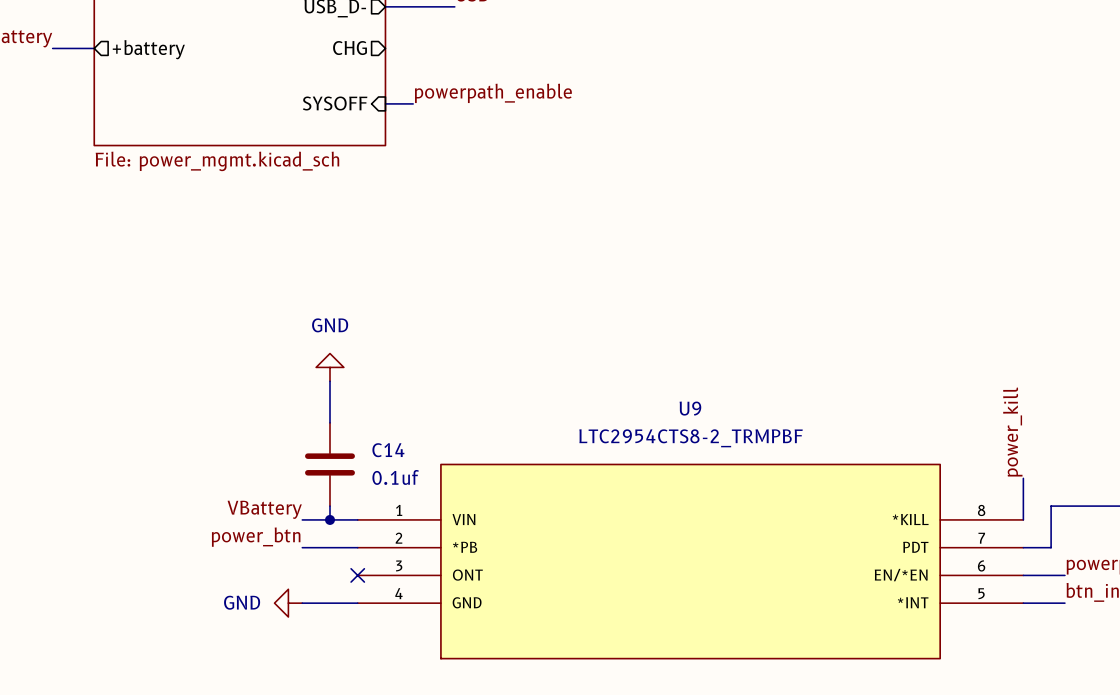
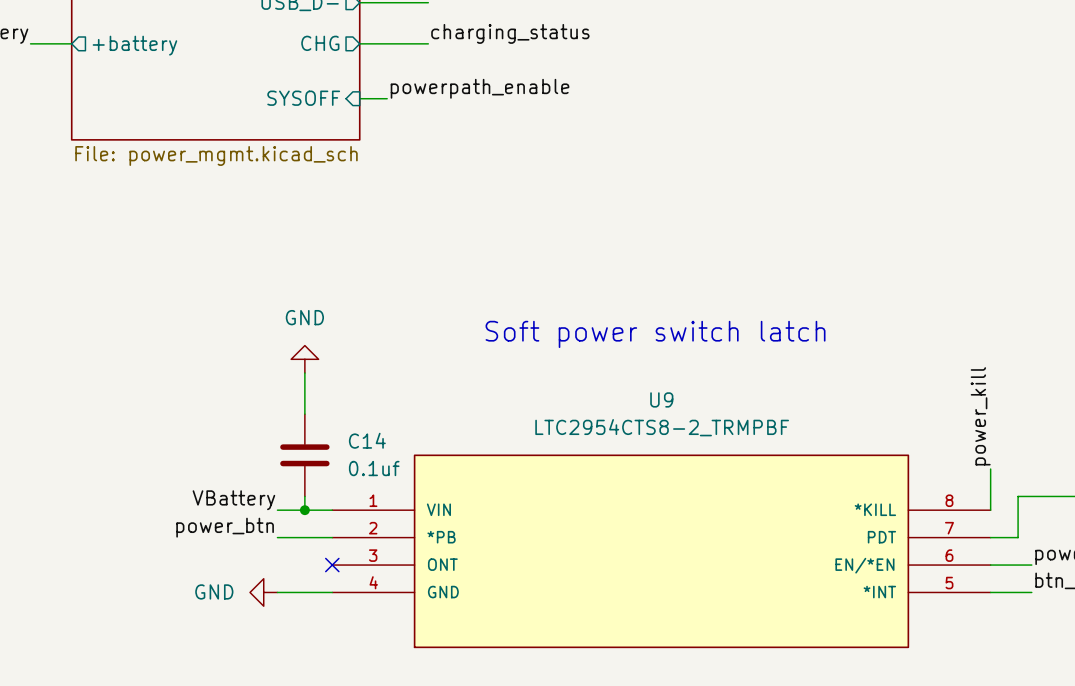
label: none -> charging_status (510, 33)
wire: none -> (359, 43) (428, 43)
text: none -> Soft power switch latch (655, 334)

